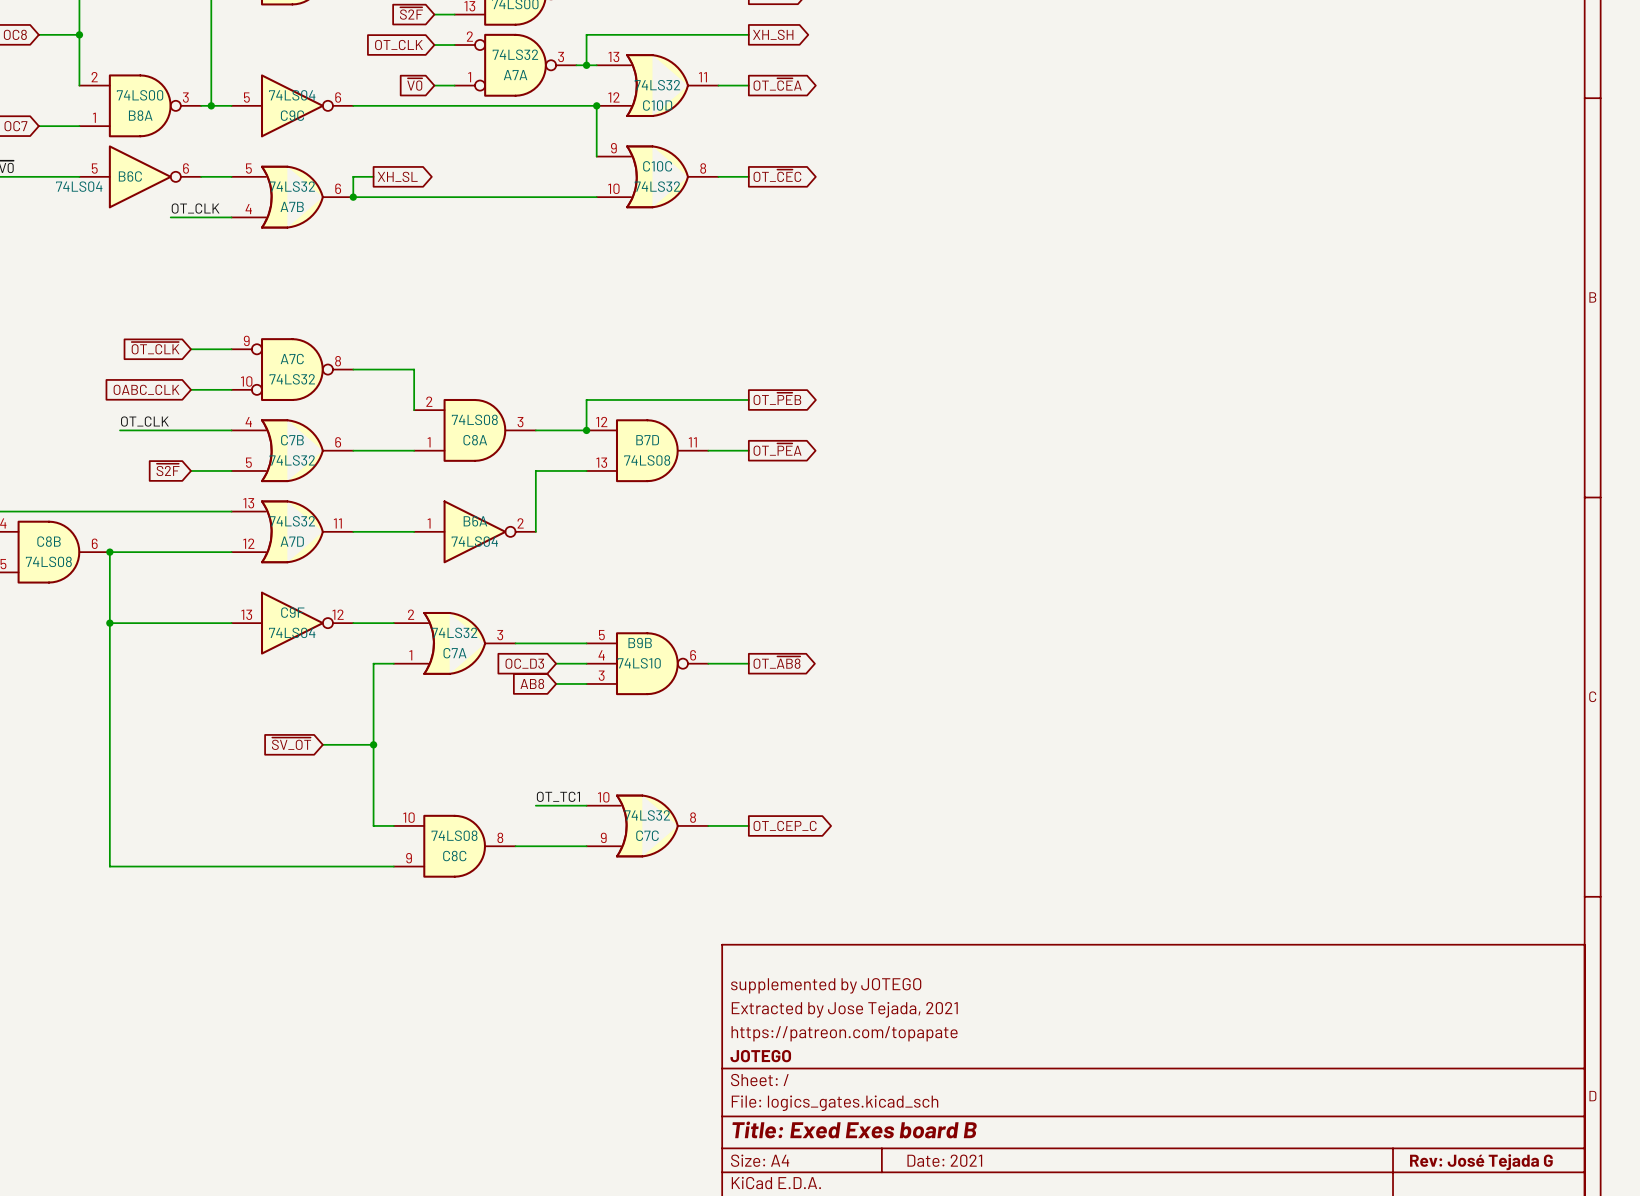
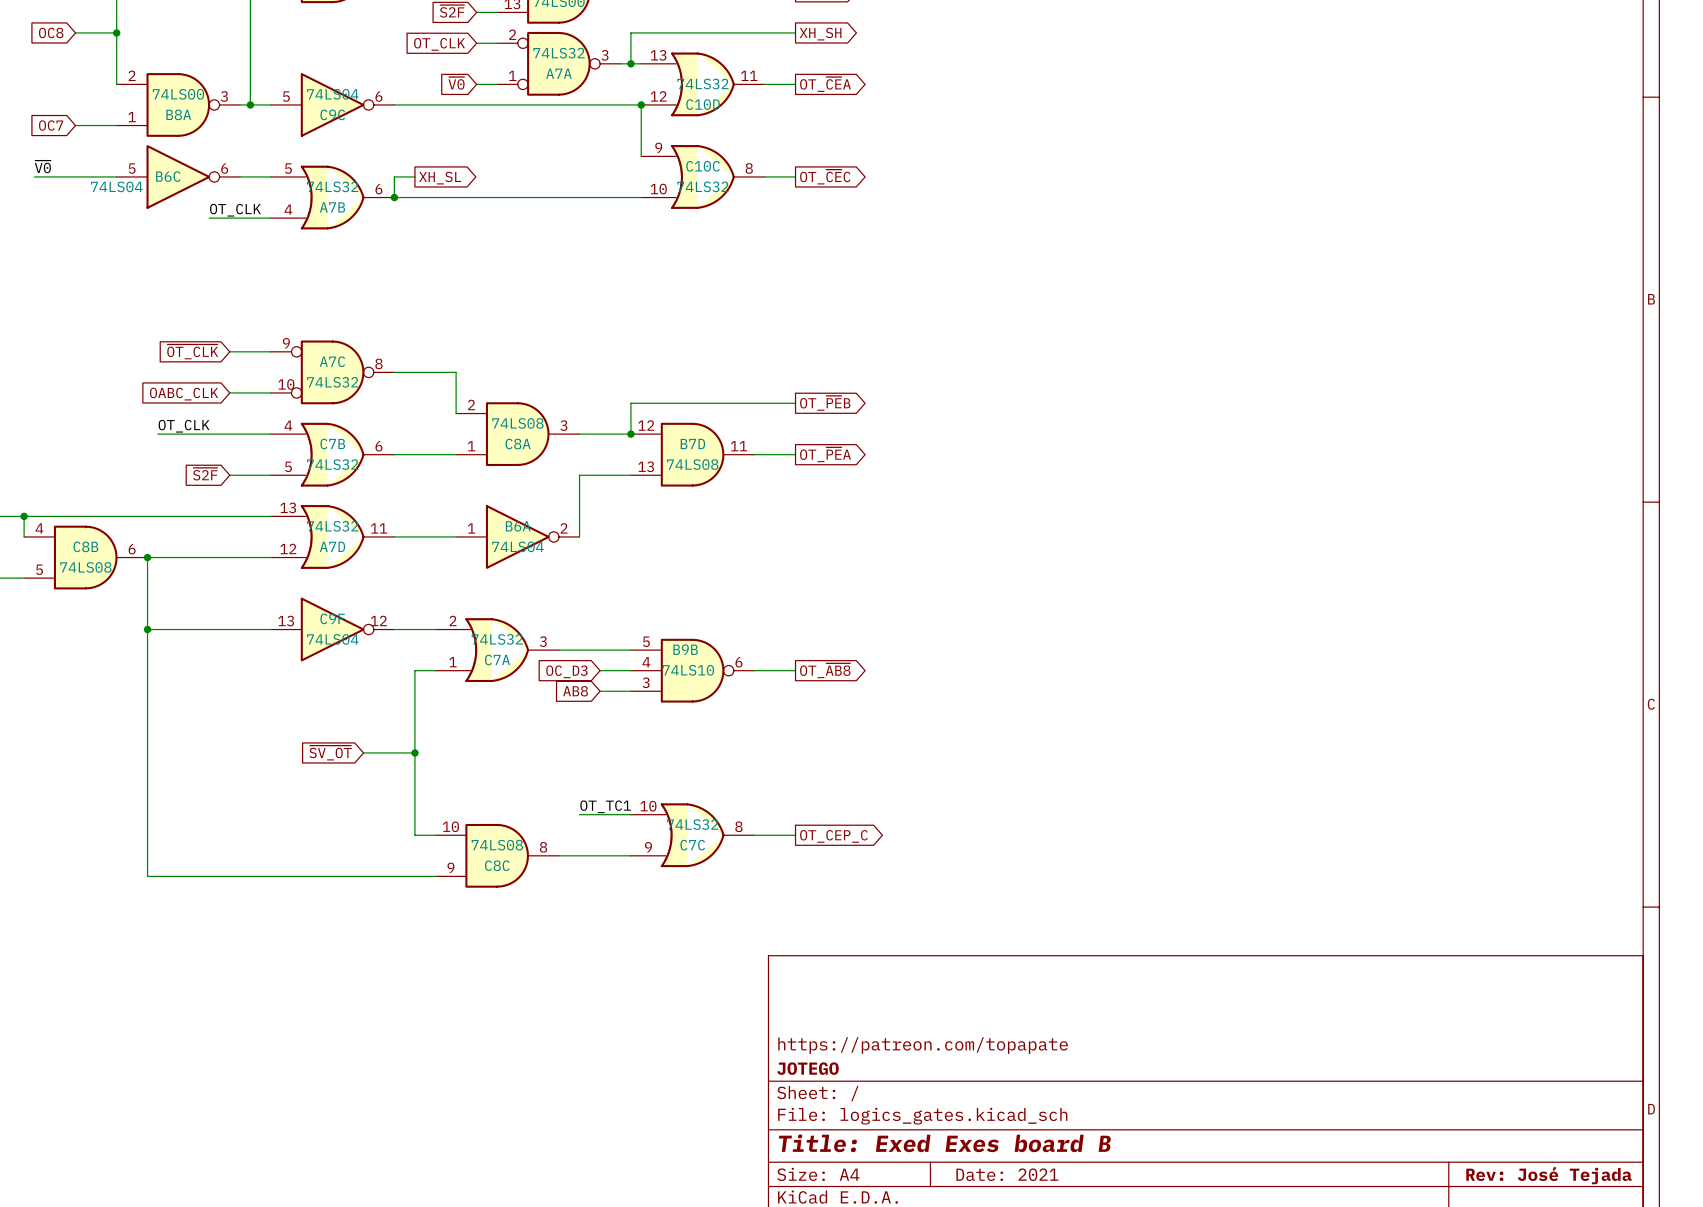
title block: supplemented by JOTEGO (826, 985) -> none
title block: Extracted by Jose Tejada, 2021 (844, 1009) -> none
title block: Rev: José Tejada G (1481, 1162) -> Rev: José Tejada (1548, 1175)

